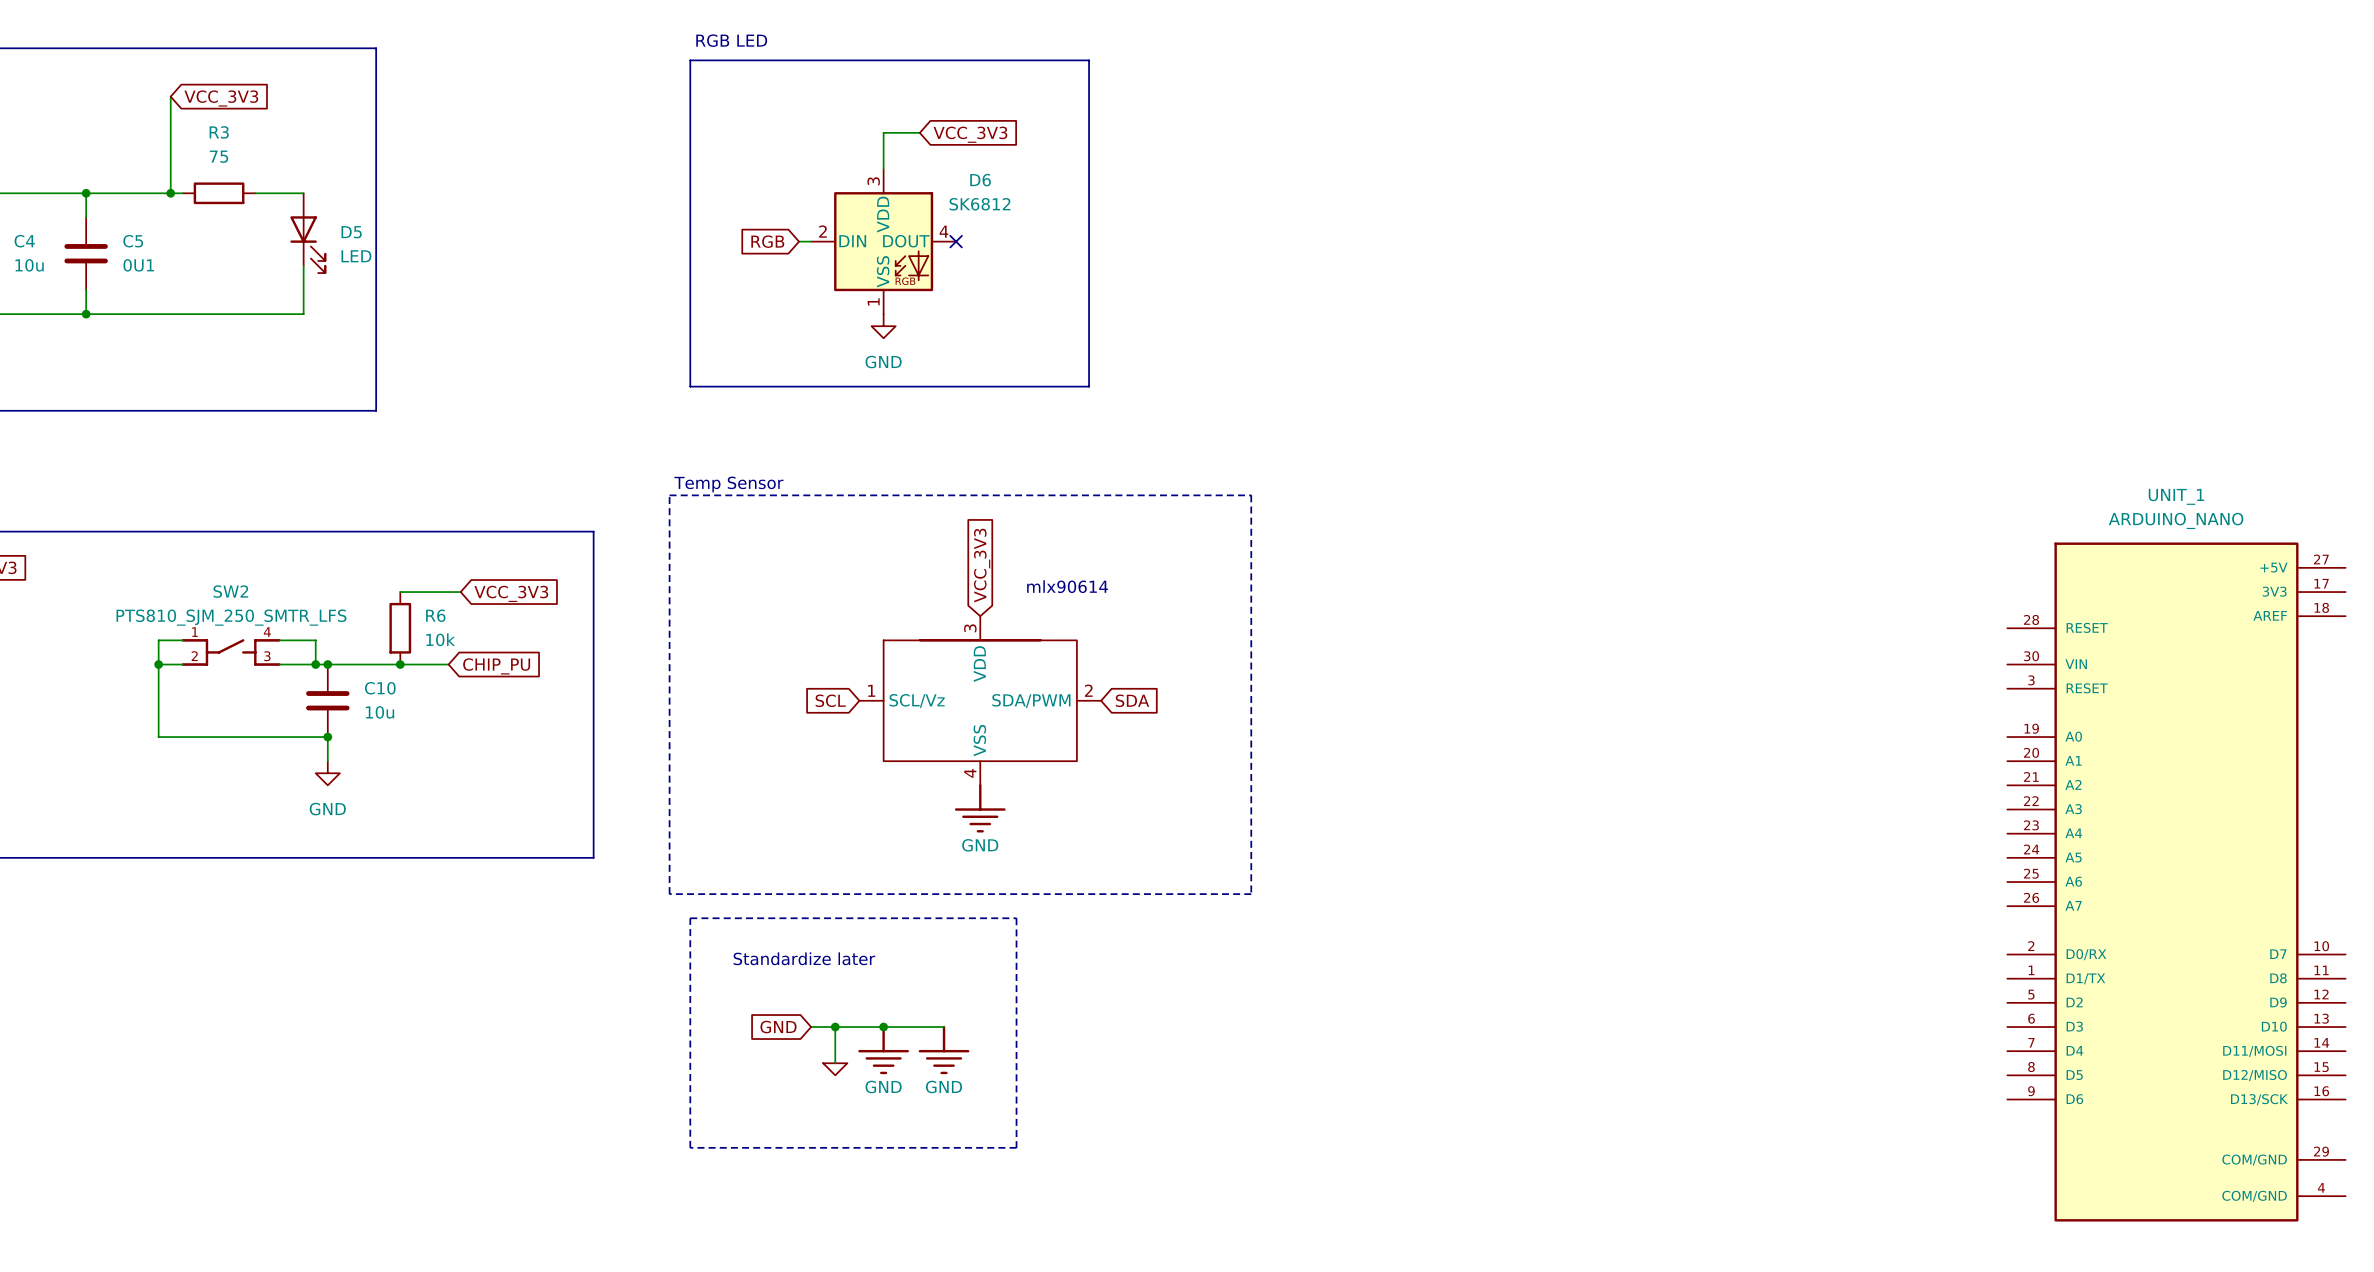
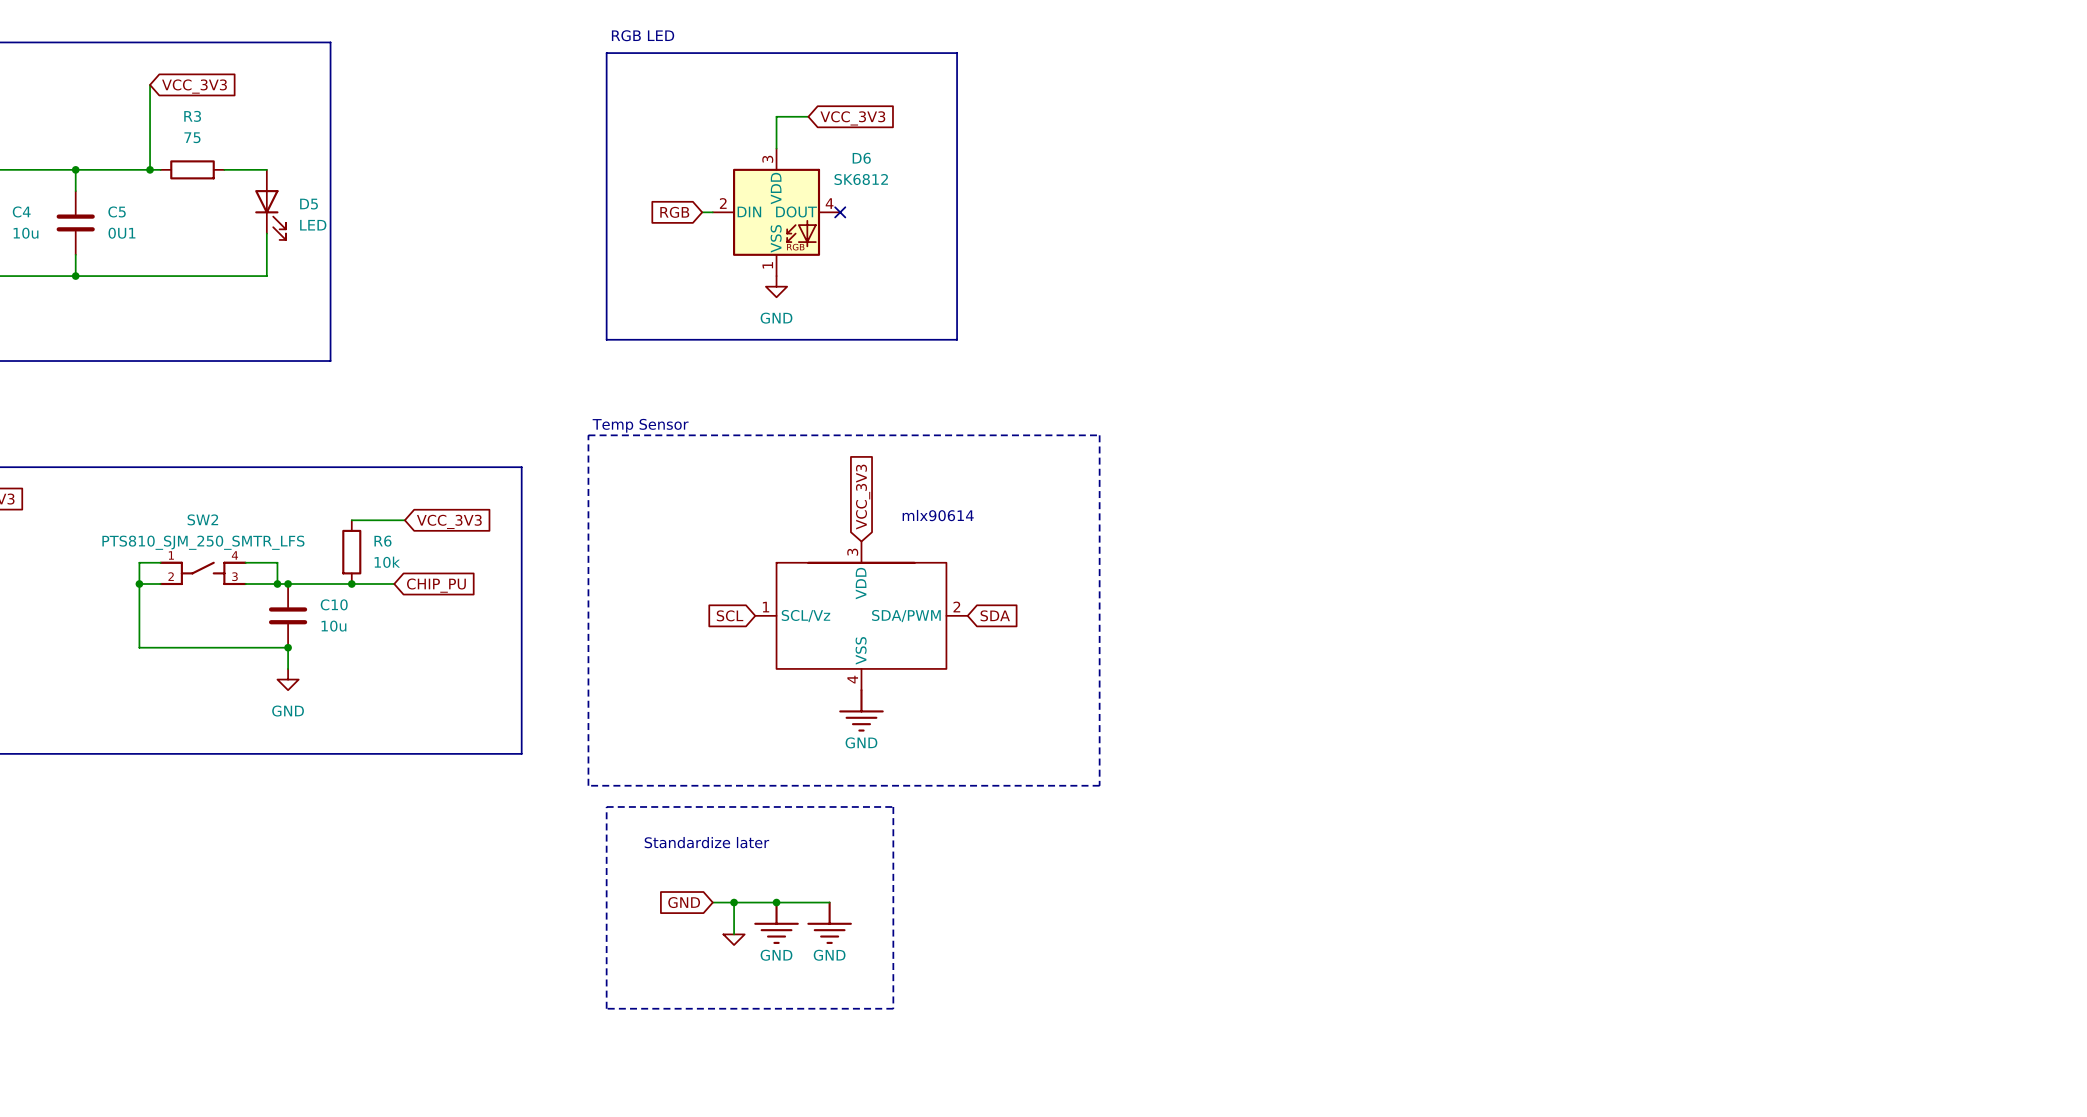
UNIT_1: ARDUINO_NANO (2176, 882) -> none

